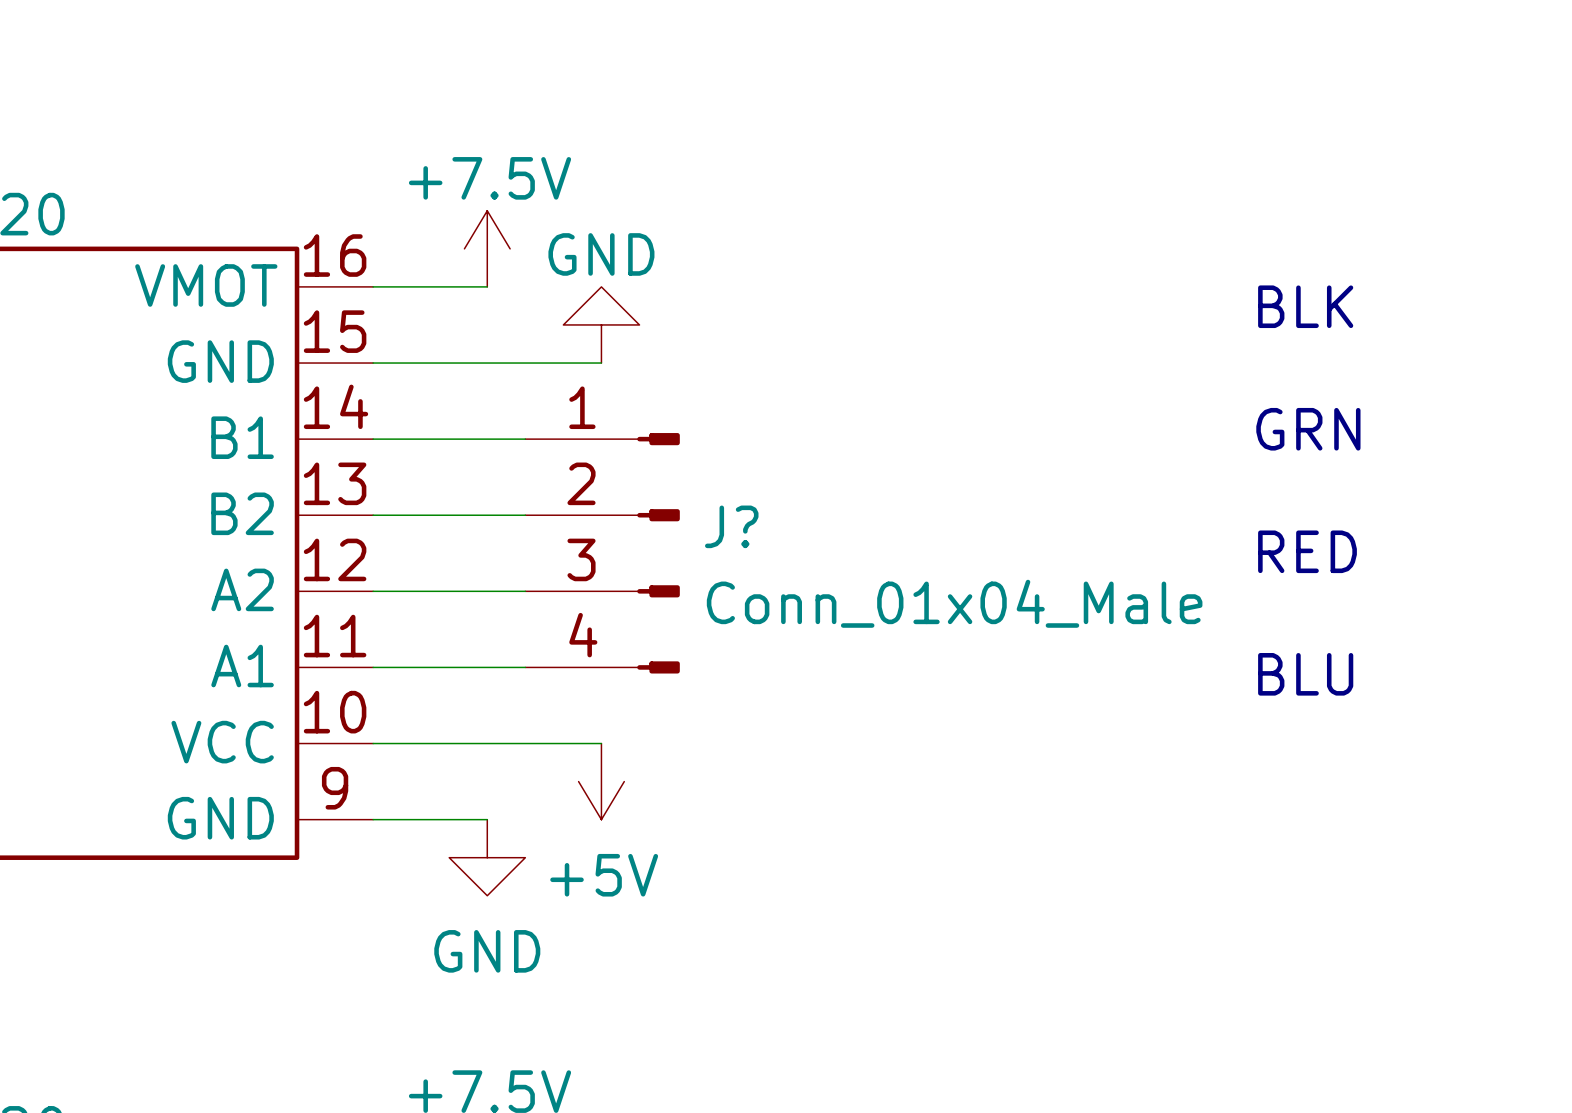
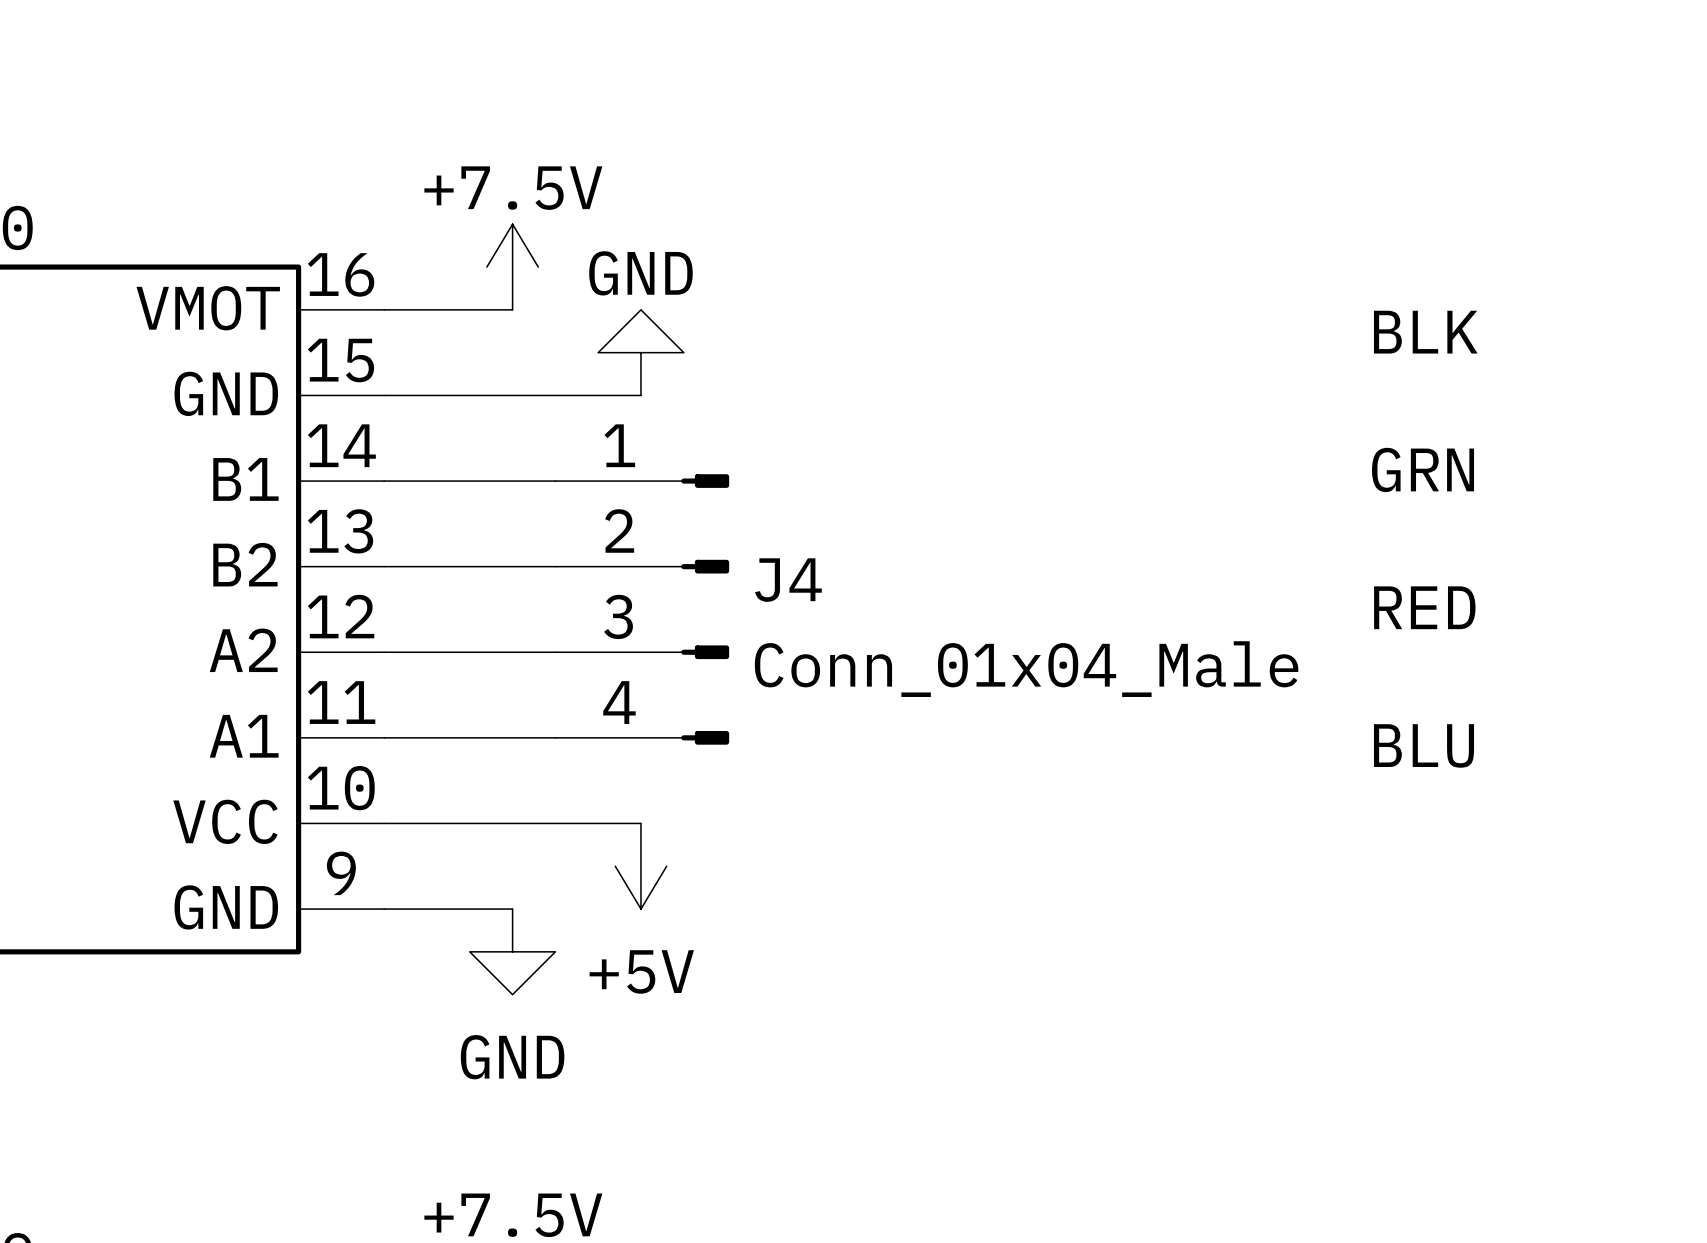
J? name: J? (731, 526) -> J4 (788, 580)

